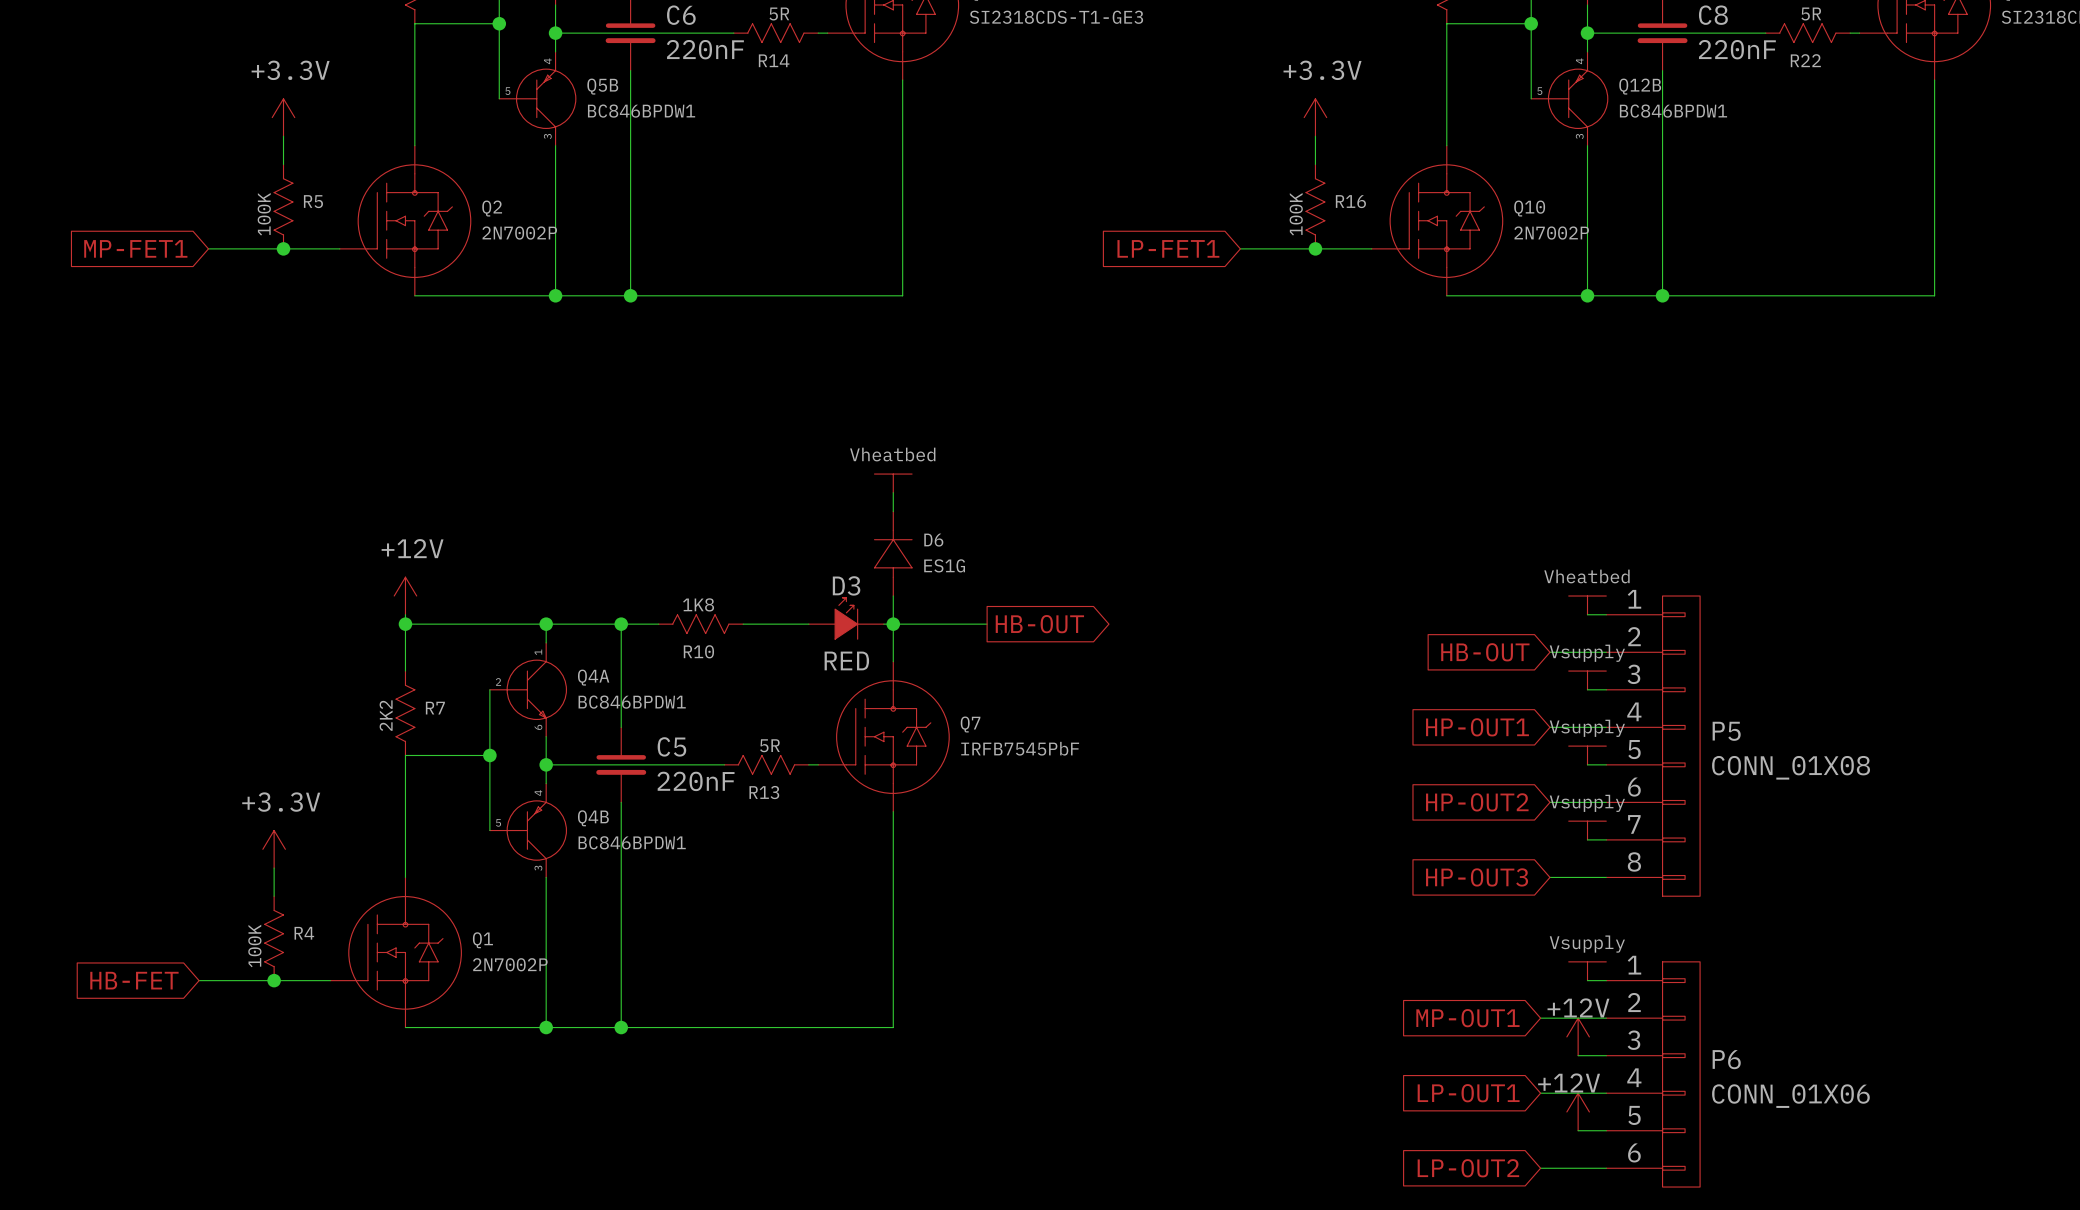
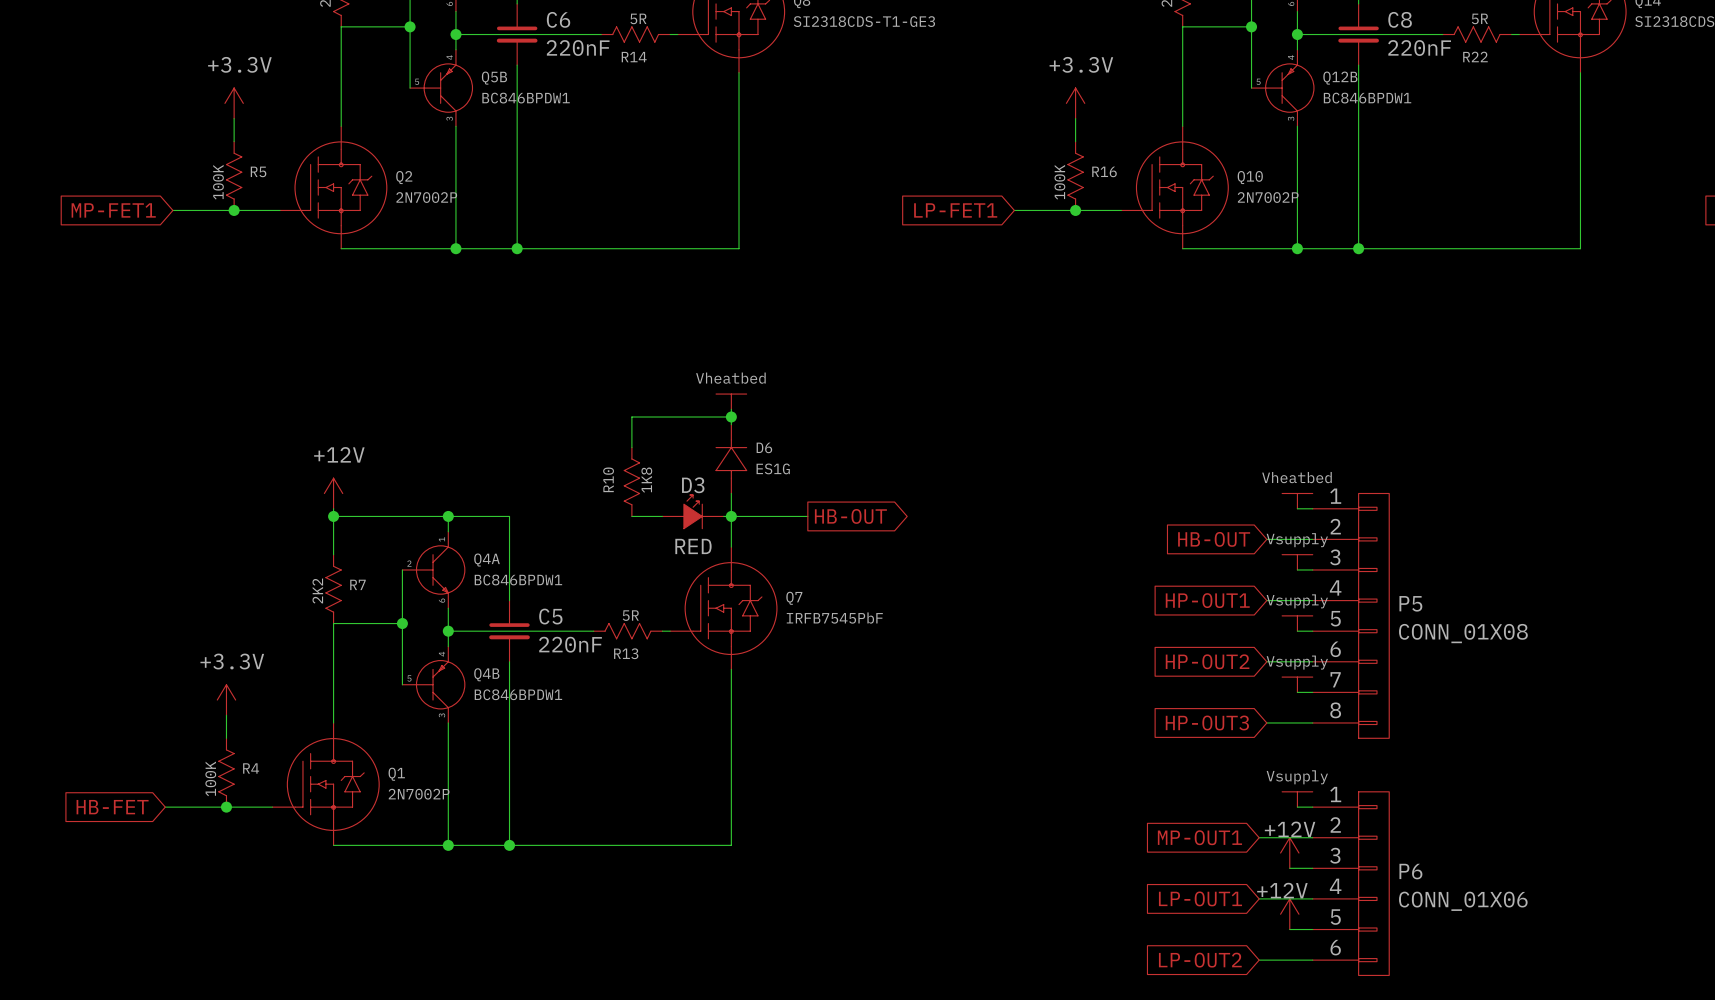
wire: none -> (731, 417) (631, 417) (631, 447)
junction: none -> (731, 417)
wire: (621, 624) (658, 624) -> none
junction: (621, 624) -> none
R10 rotation: 0° (700, 624) -> 90° clockwise (631, 481)
R10 position: (700, 624) -> (631, 482)
wire: (743, 624) (771, 624) -> none

